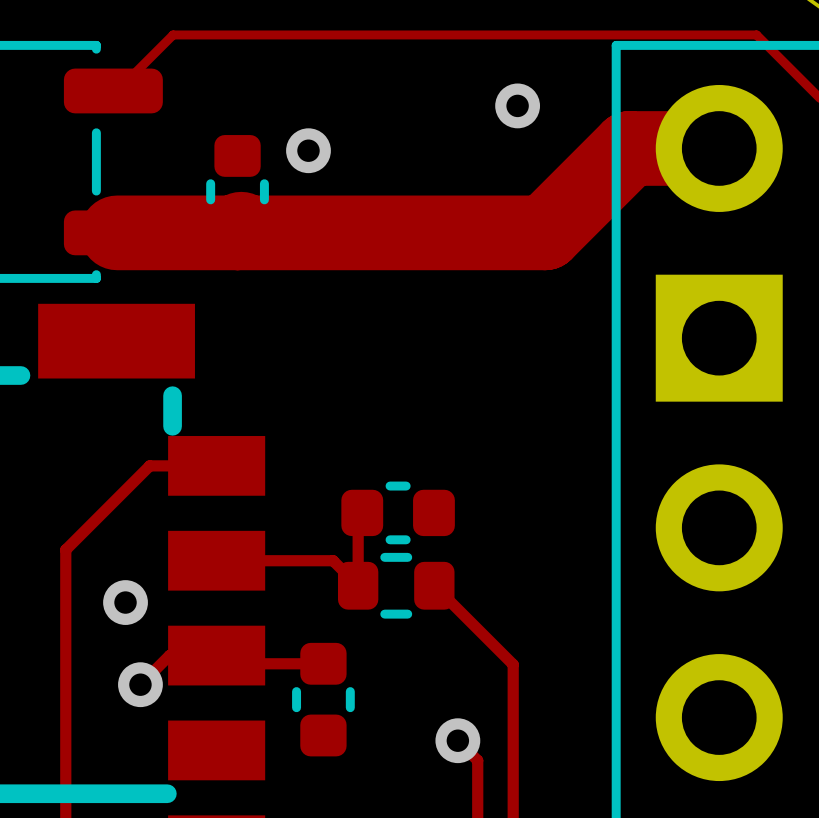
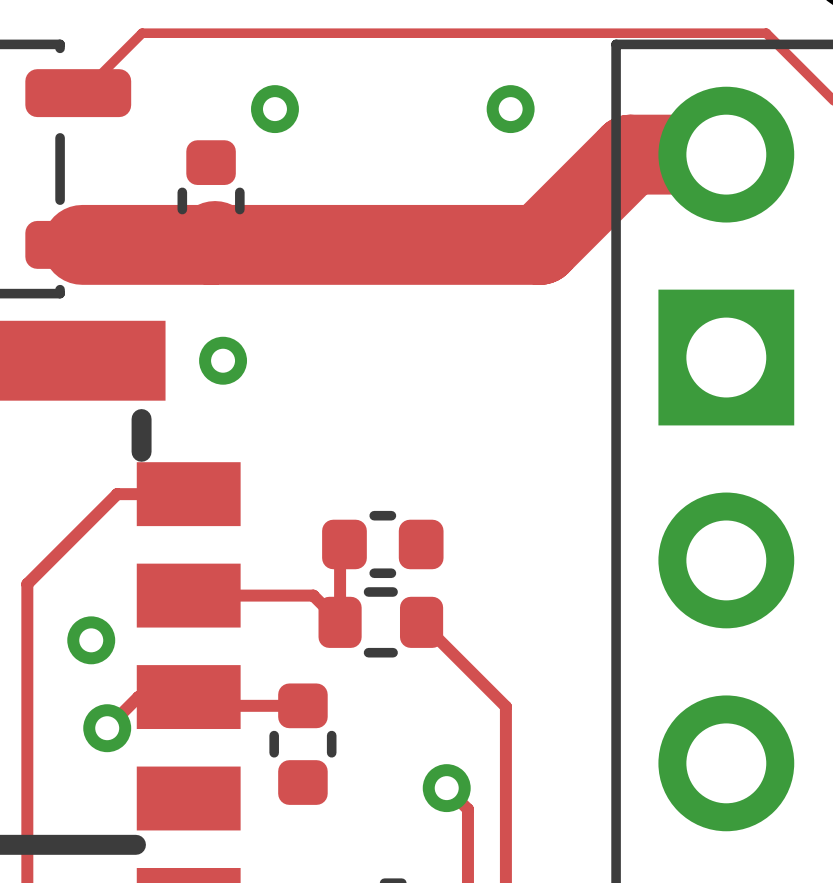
via position: (308, 150) -> (274, 109)
via: none -> (223, 360)

